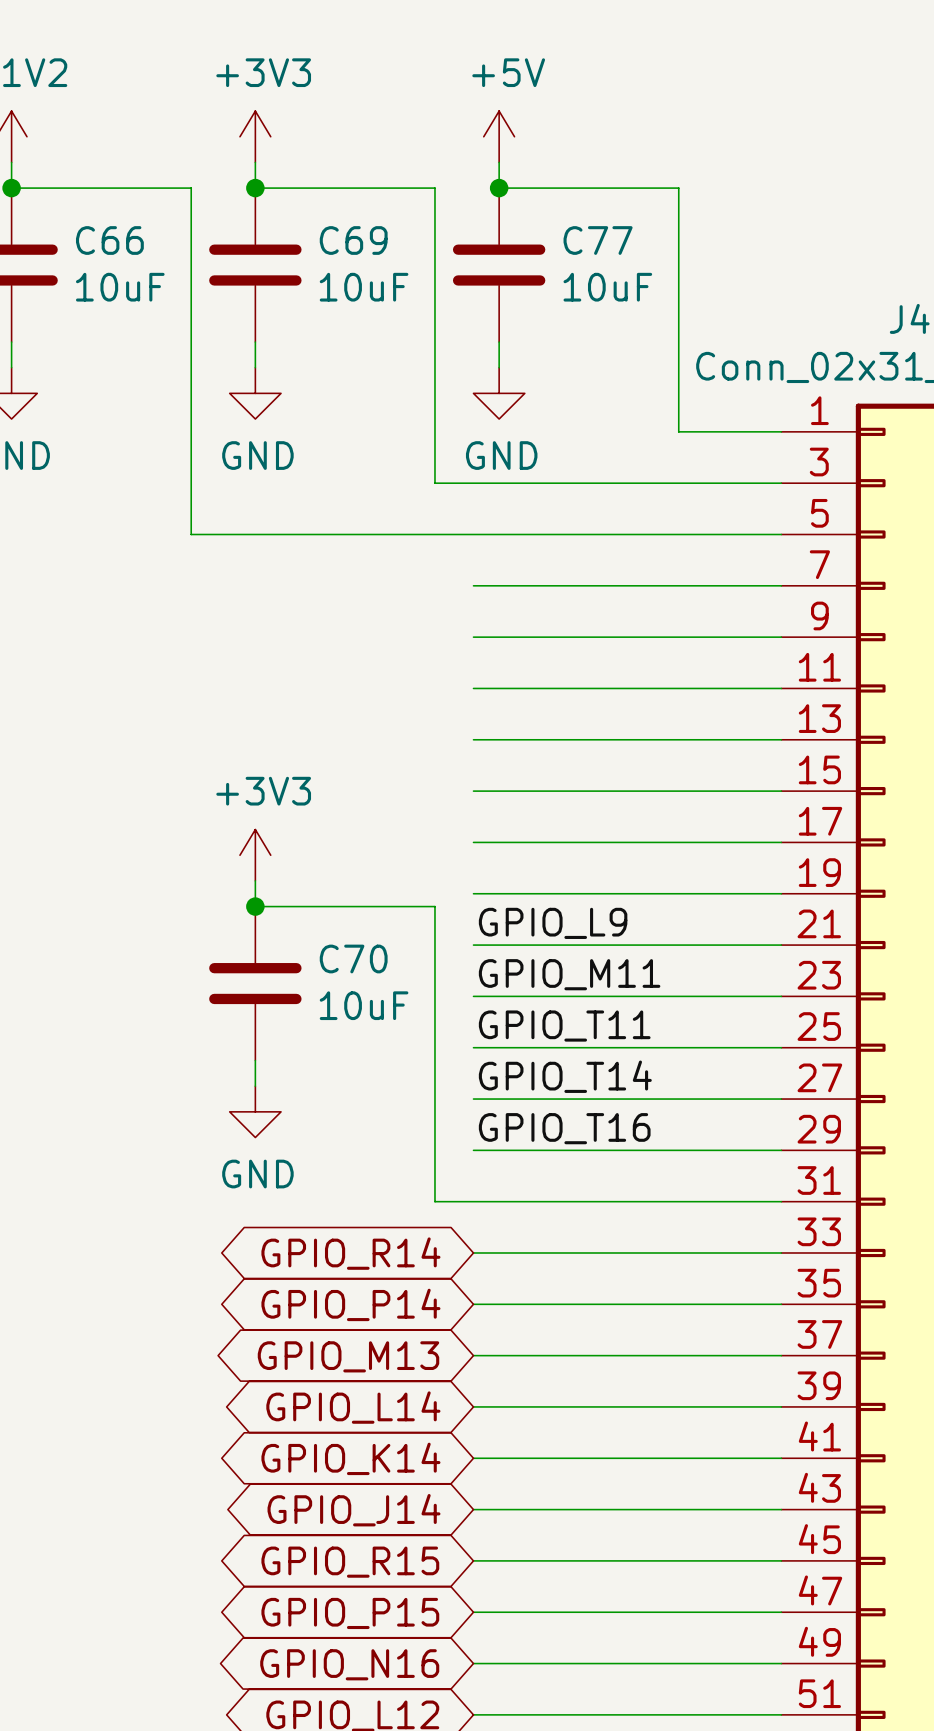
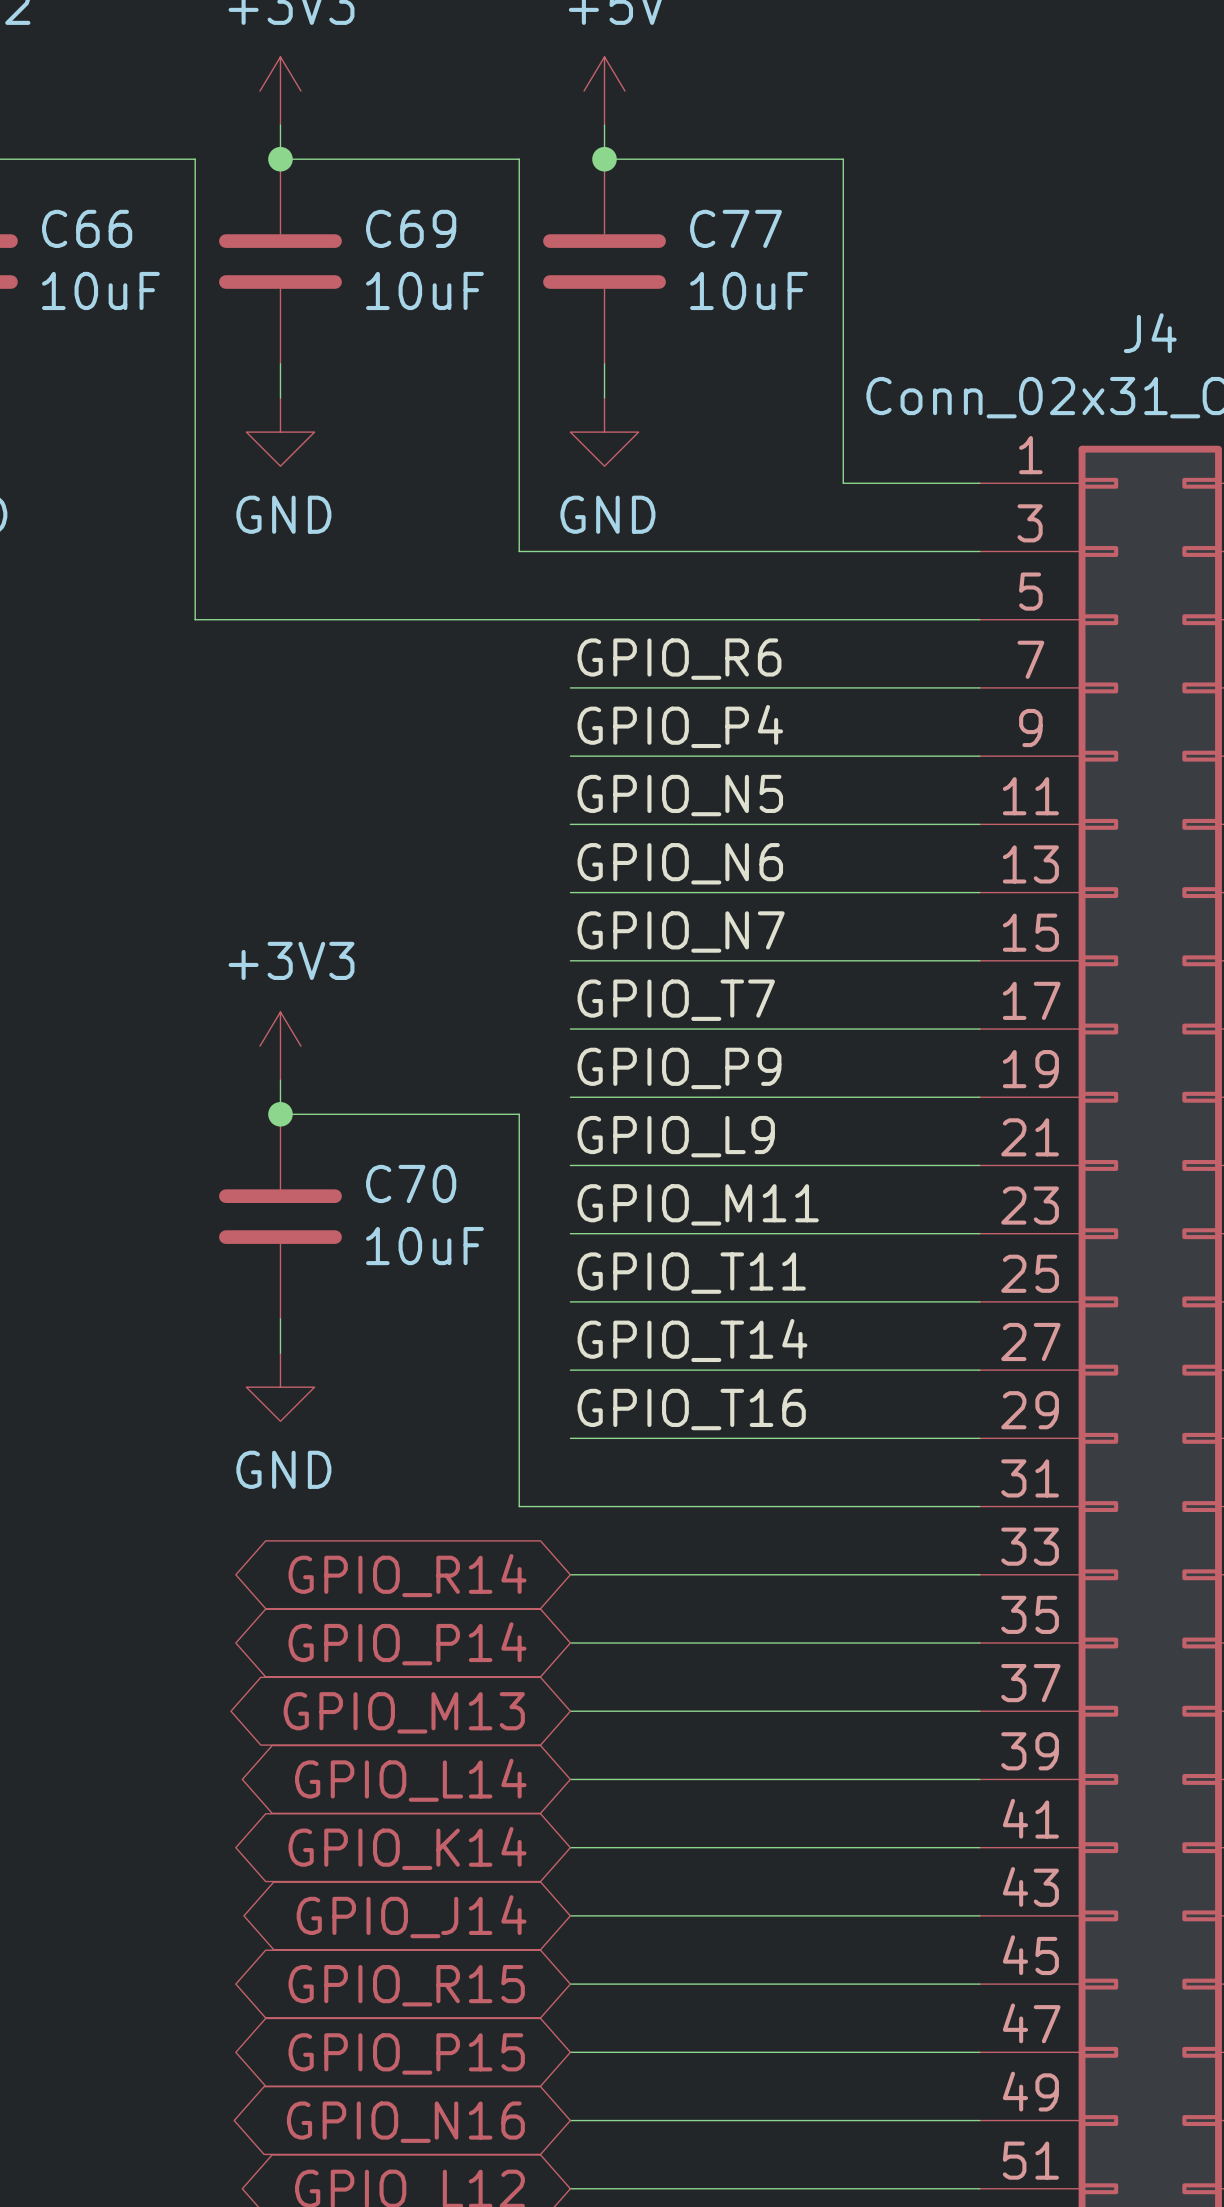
label: none -> GPIO_R6 (679, 659)
label: none -> GPIO_P4 (680, 726)
label: none -> GPIO_N5 (680, 795)
label: none -> GPIO_N6 (680, 863)
label: none -> GPIO_N7 (681, 931)
label: none -> GPIO_T7 (676, 1000)
label: none -> GPIO_P9 (679, 1068)

